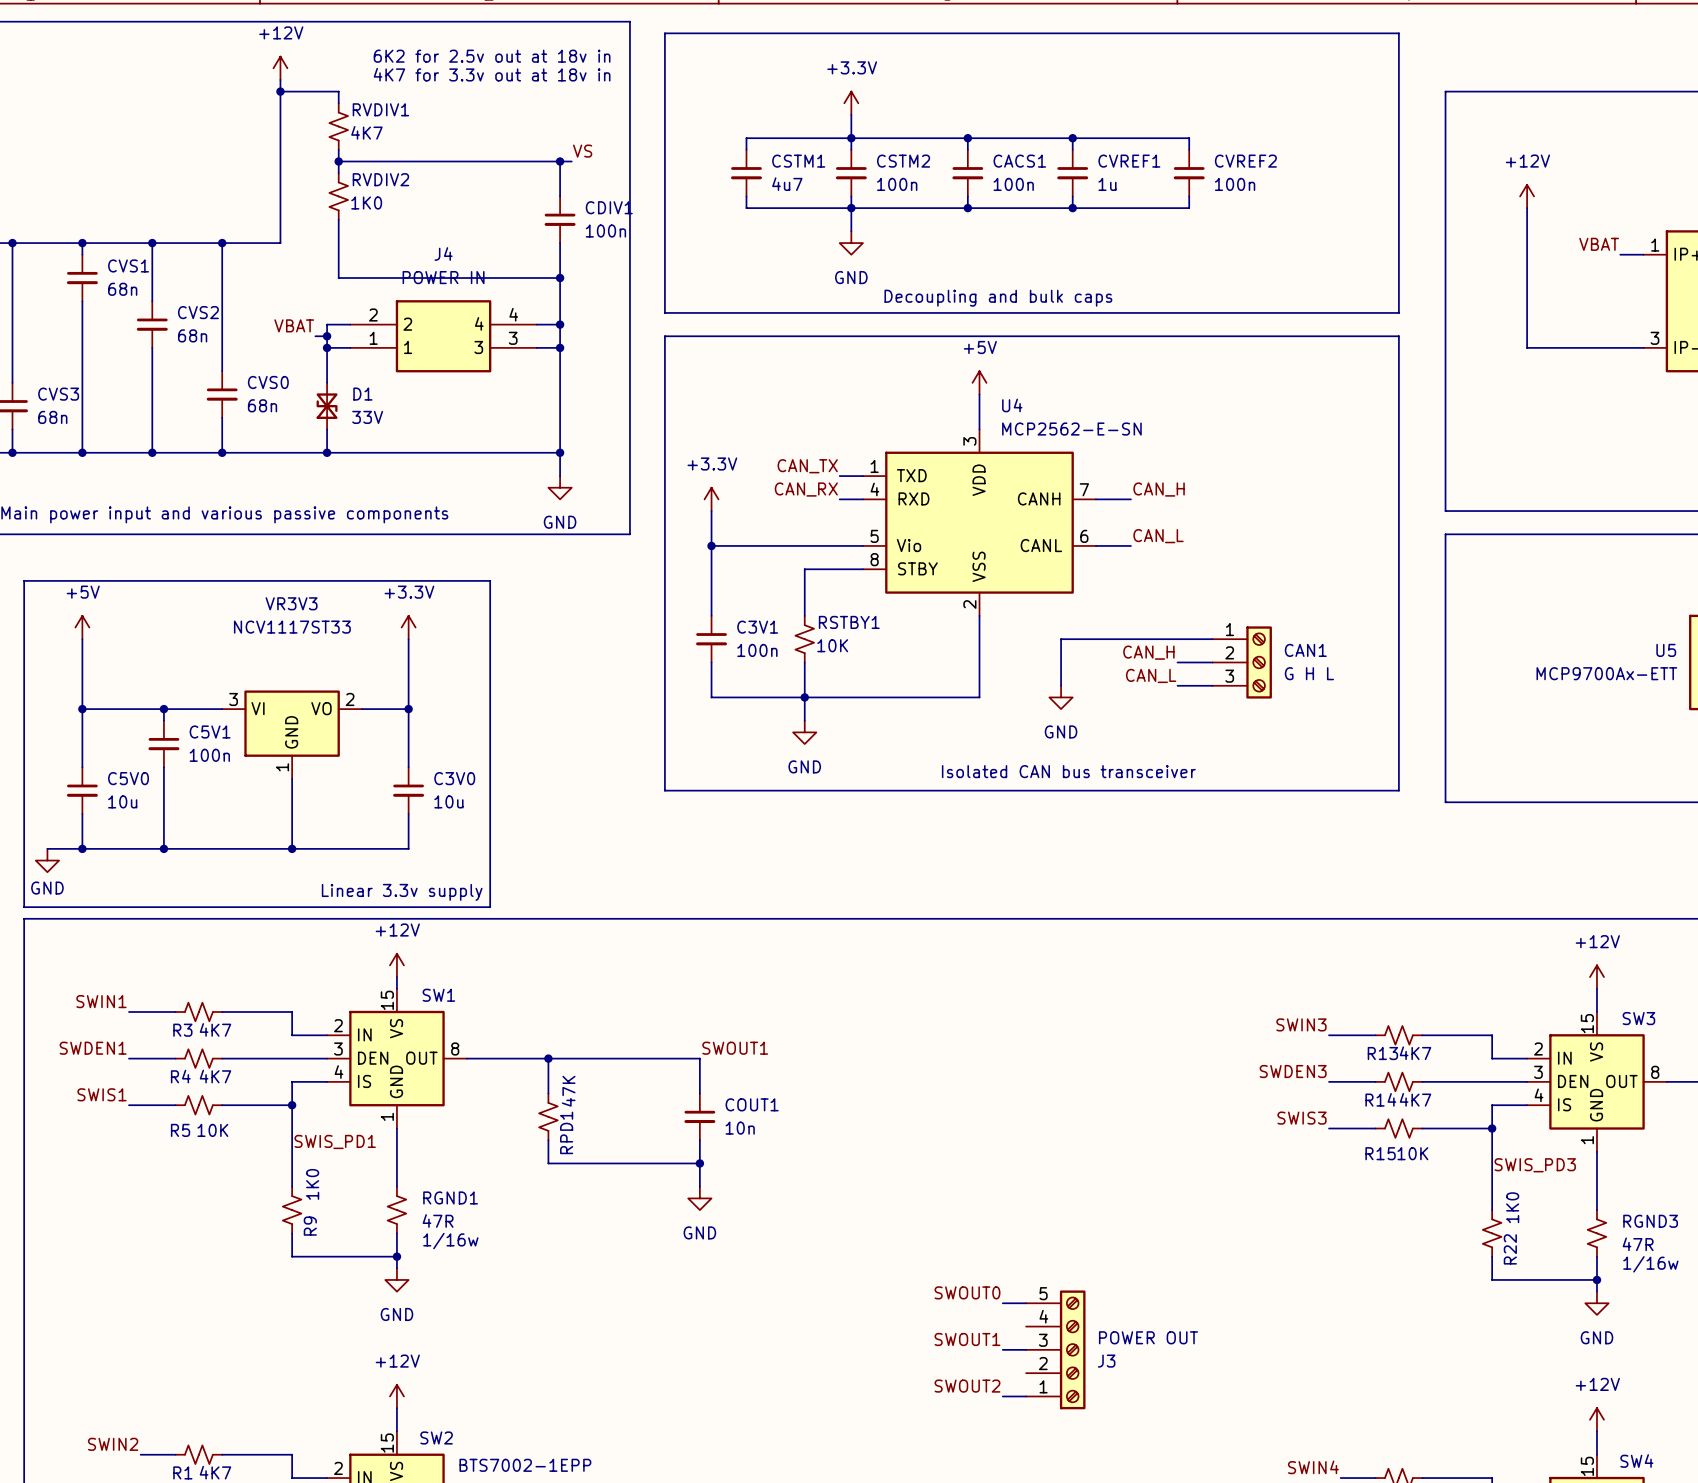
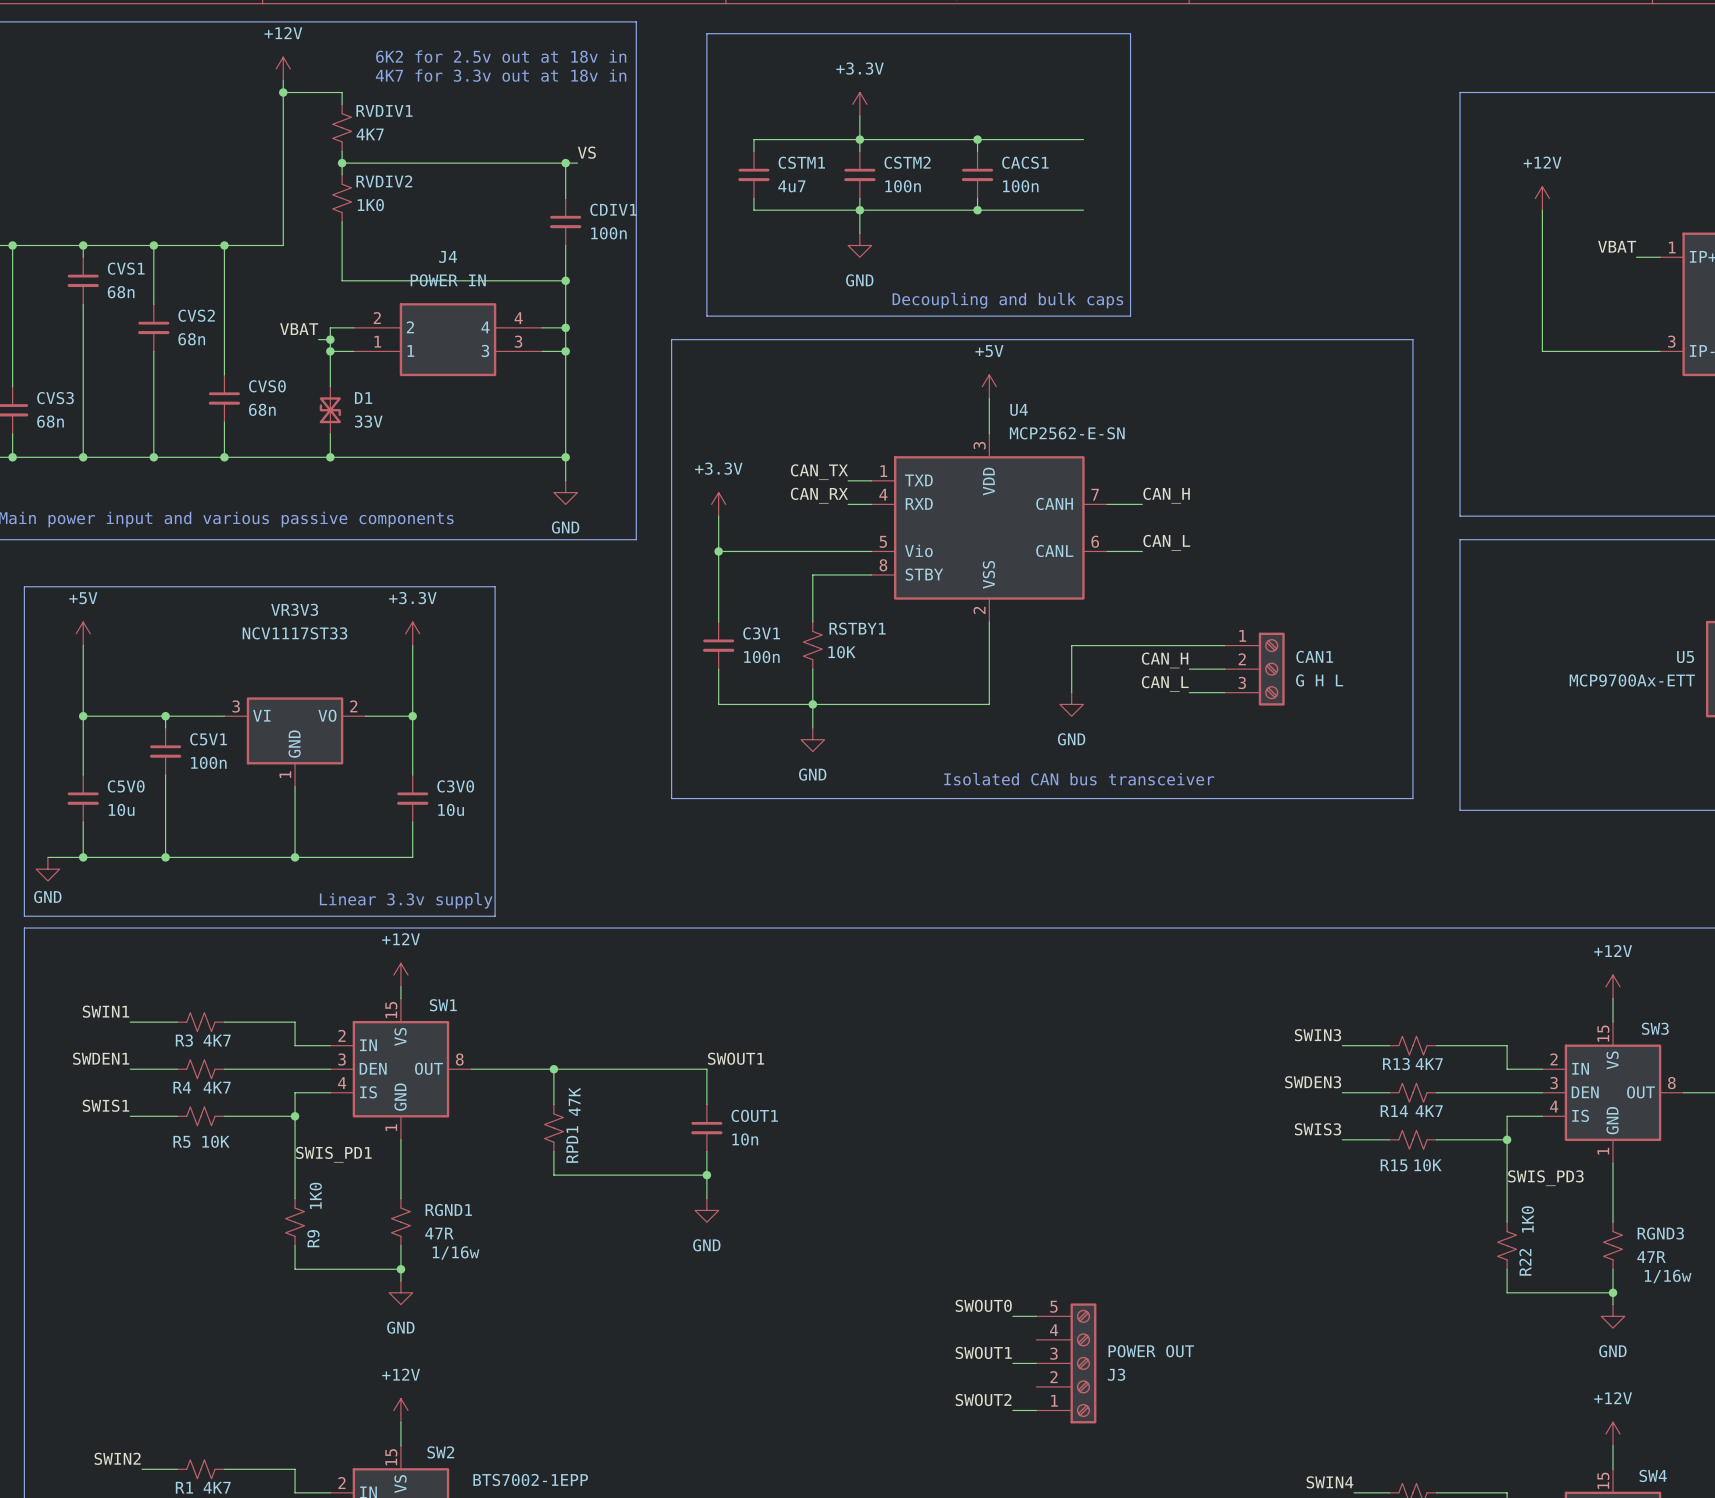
line: (699, 33) (664, 33) (664, 312) (699, 312) -> (706, 33) (706, 316)
line: (1119, 33) (1398, 33) (1398, 312) (1119, 312) -> (1130, 33) (1130, 316)
junction: (1072, 138) -> none
wire: (1072, 149) (1072, 138) (1189, 138) (1189, 149) -> none
CVREF1: 1u (1072, 173) -> none
CVREF2: 100n (1189, 173) -> none
wire: (1072, 196) (1072, 208) (1189, 208) (1189, 196) -> none
junction: (1072, 208) -> none

